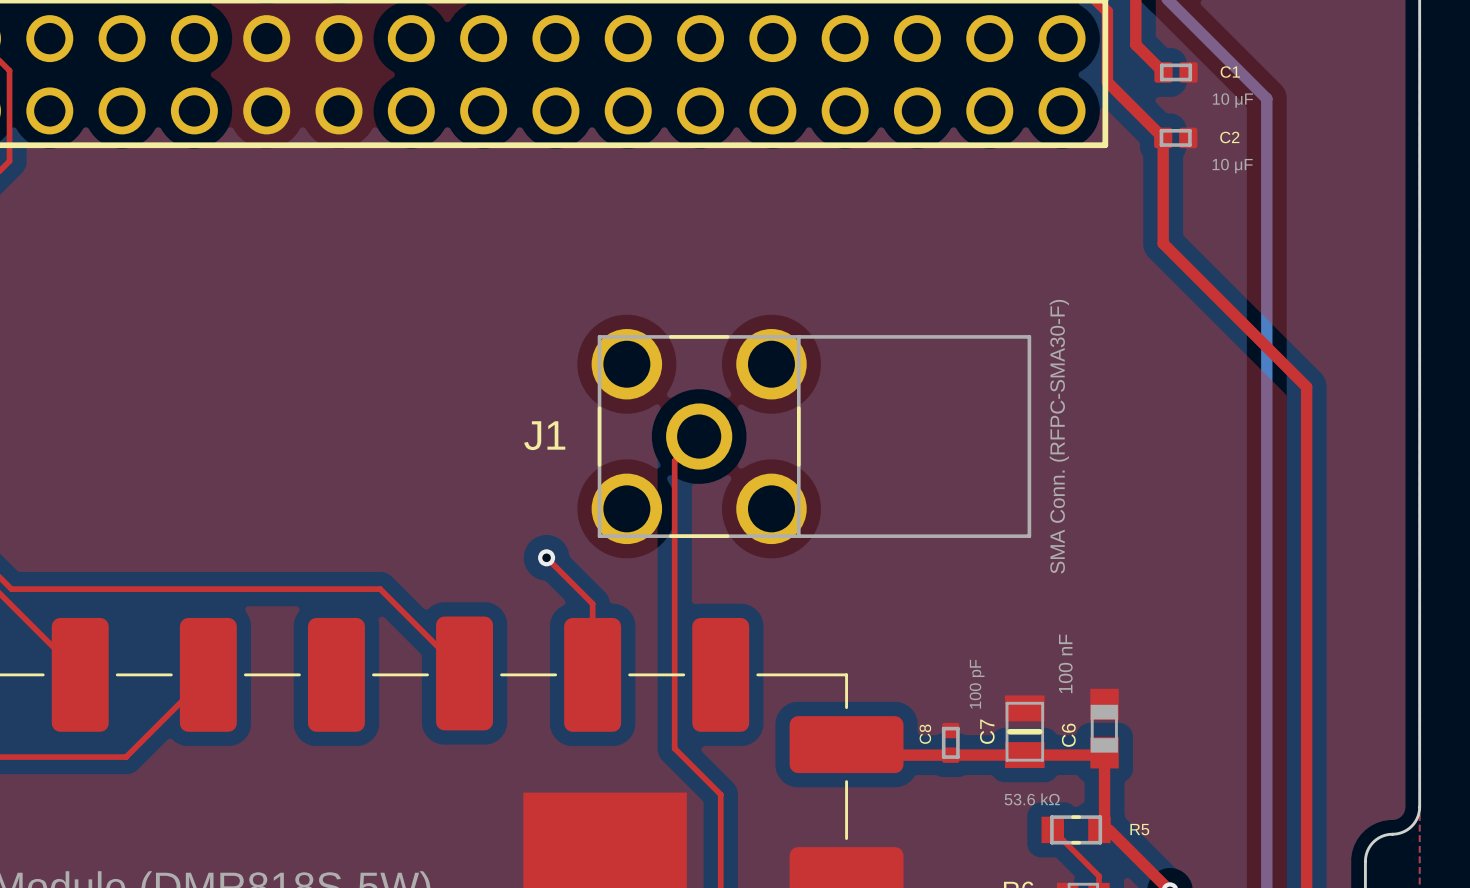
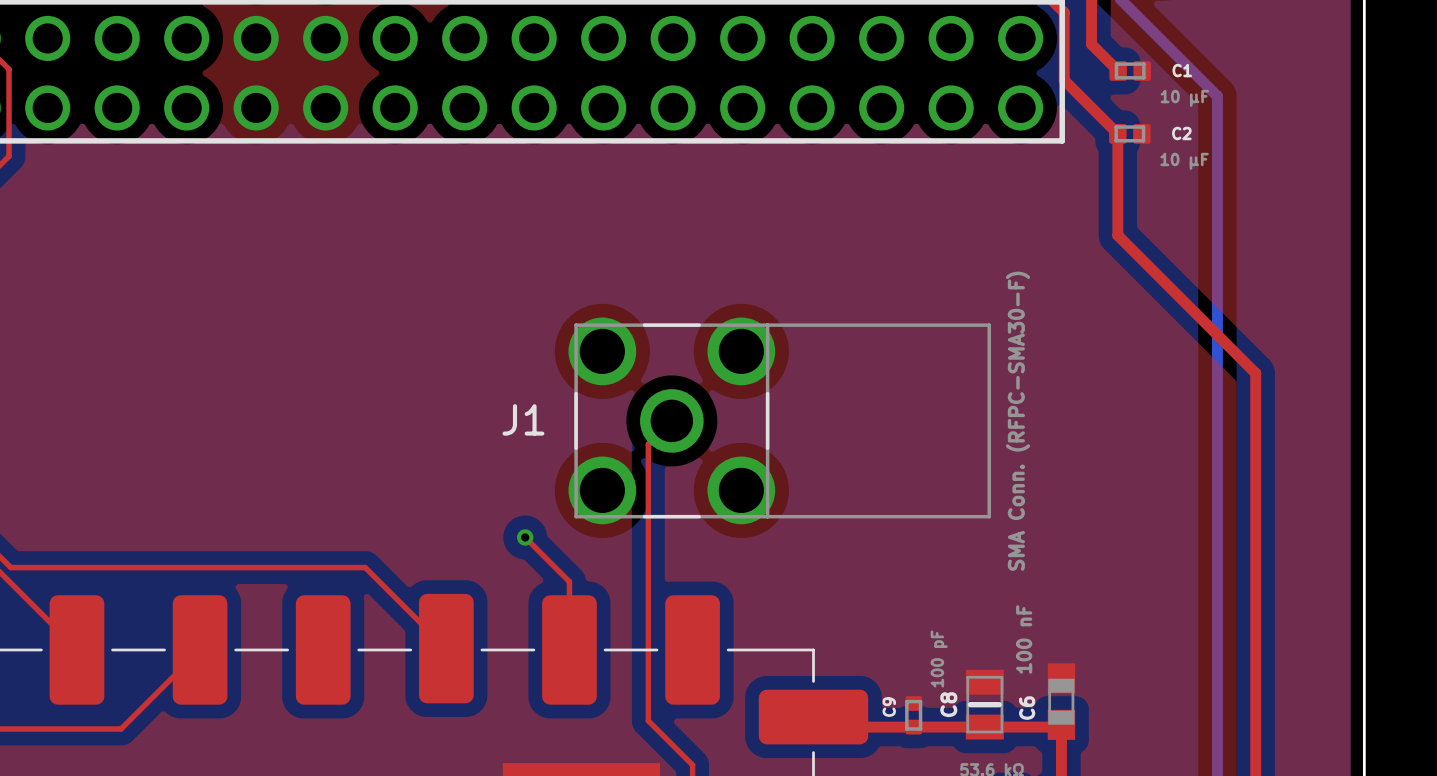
C7 name: C7 (987, 731) -> C8 (948, 704)
C8 name: C8 (925, 734) -> C9 (889, 707)

